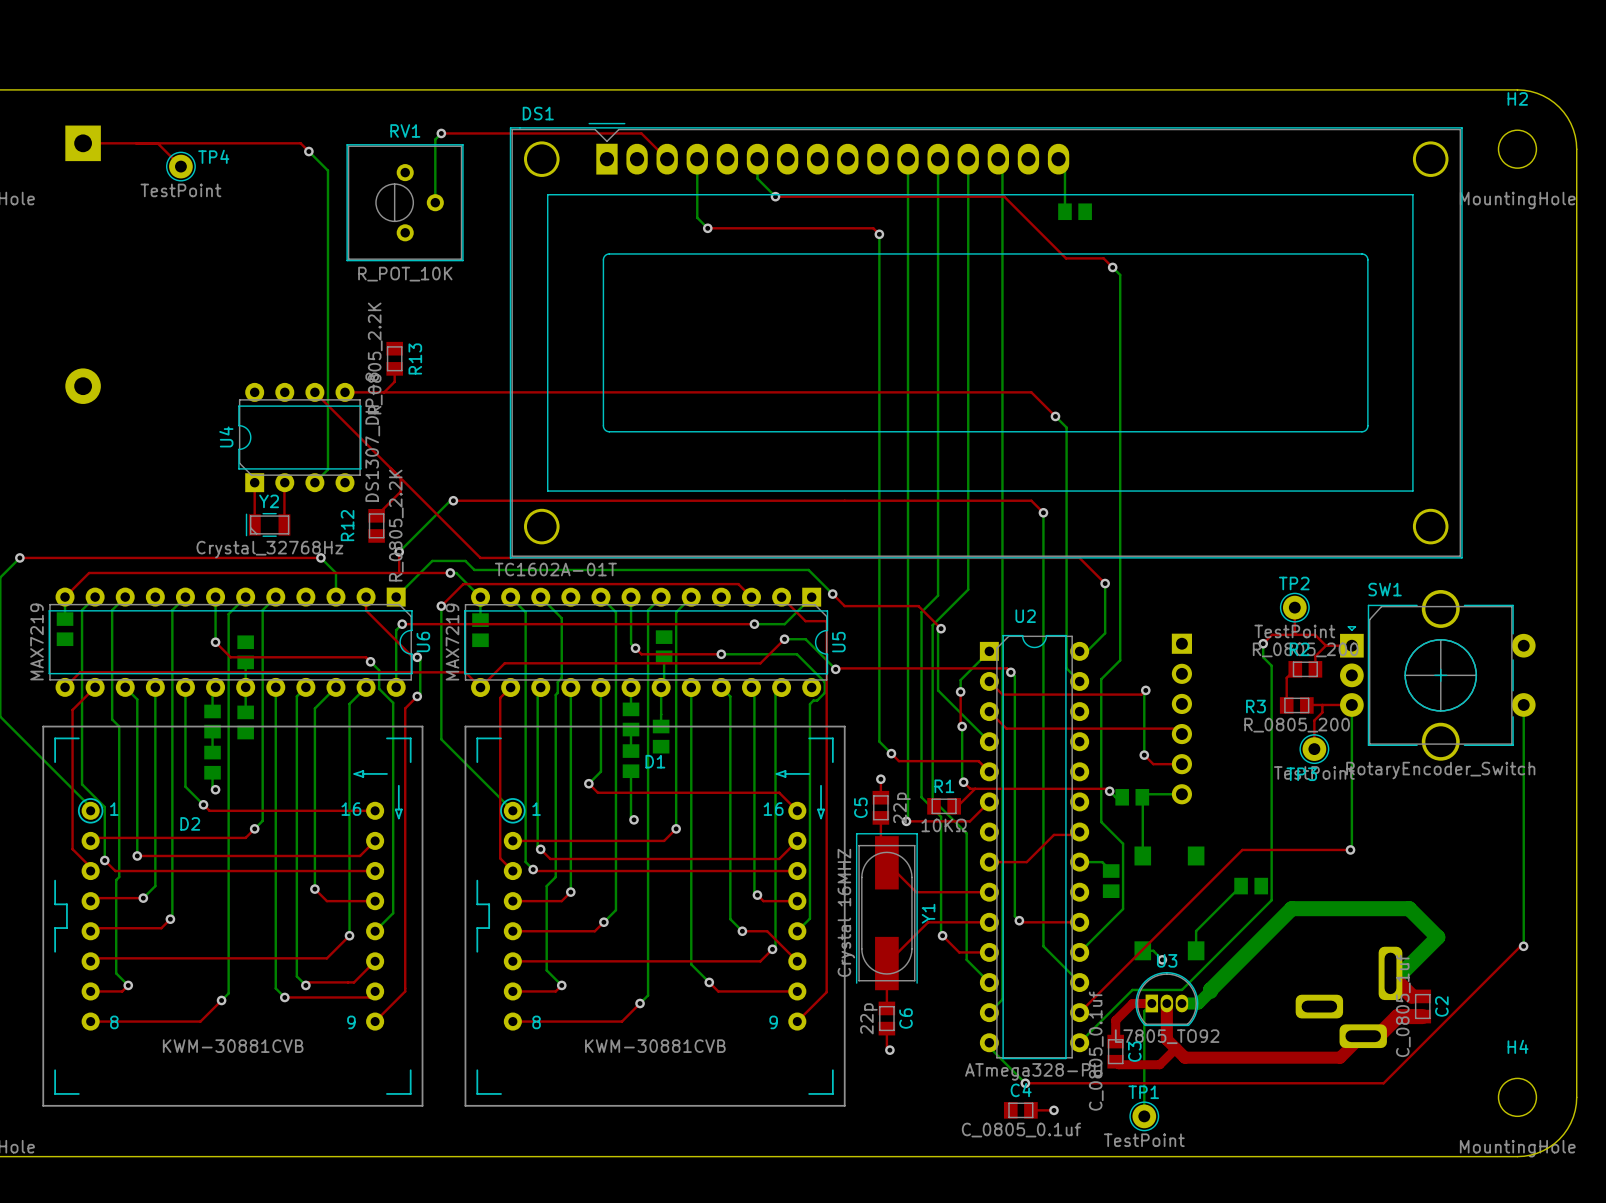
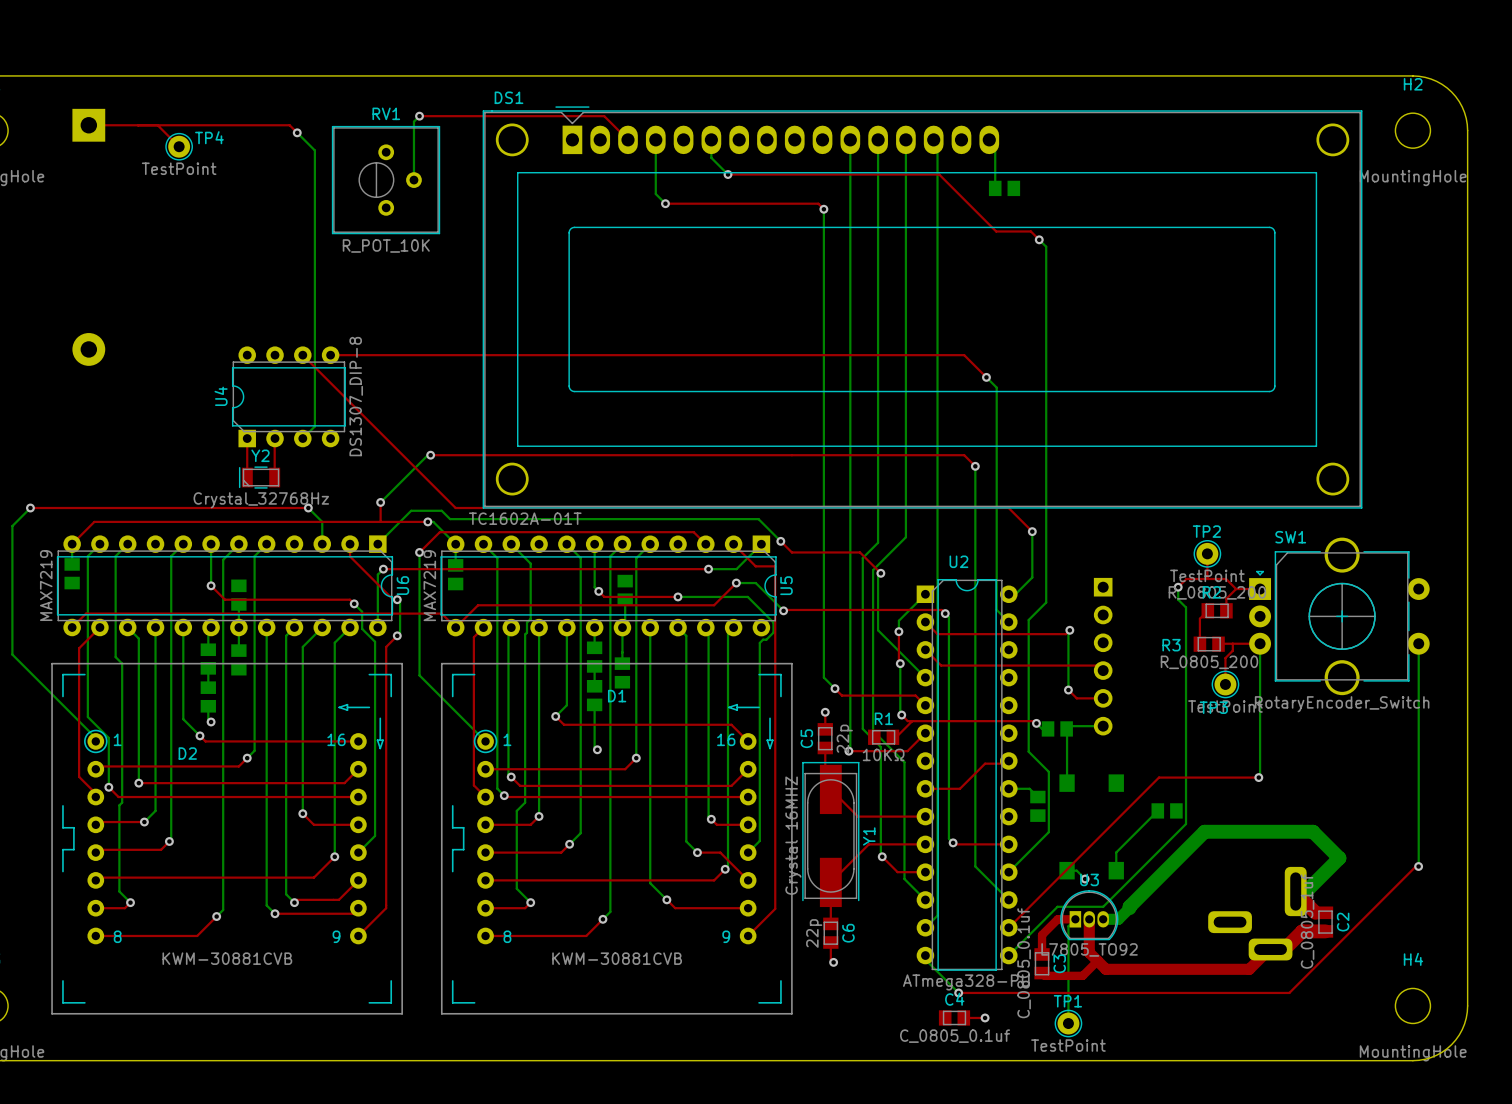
R13: R_0805_2.2K (394, 358) -> none
top track: (394, 368) (394, 381) (384, 392) -> none
top track: (400, 478) (400, 491) (376, 515) -> none
R12: R_0805_2.2K (376, 525) -> none

